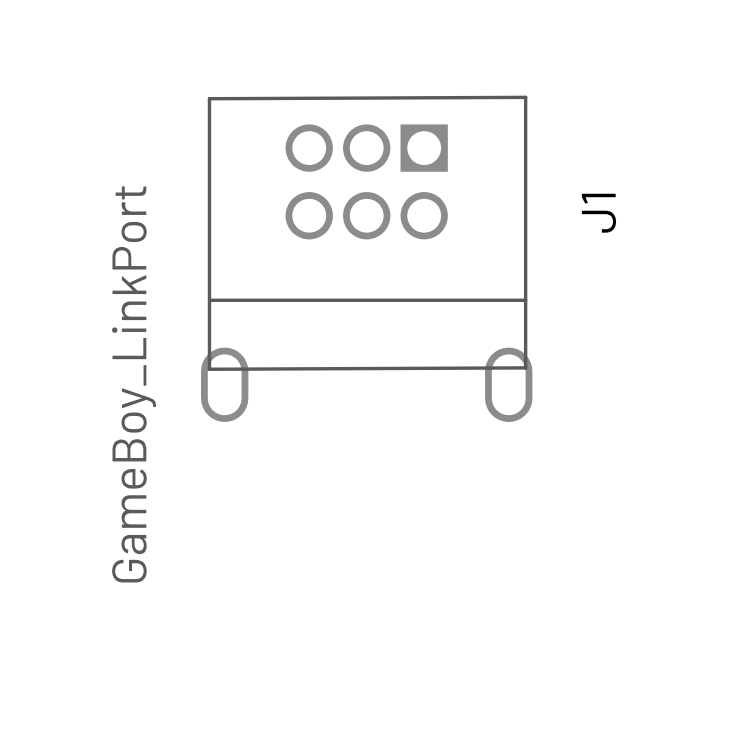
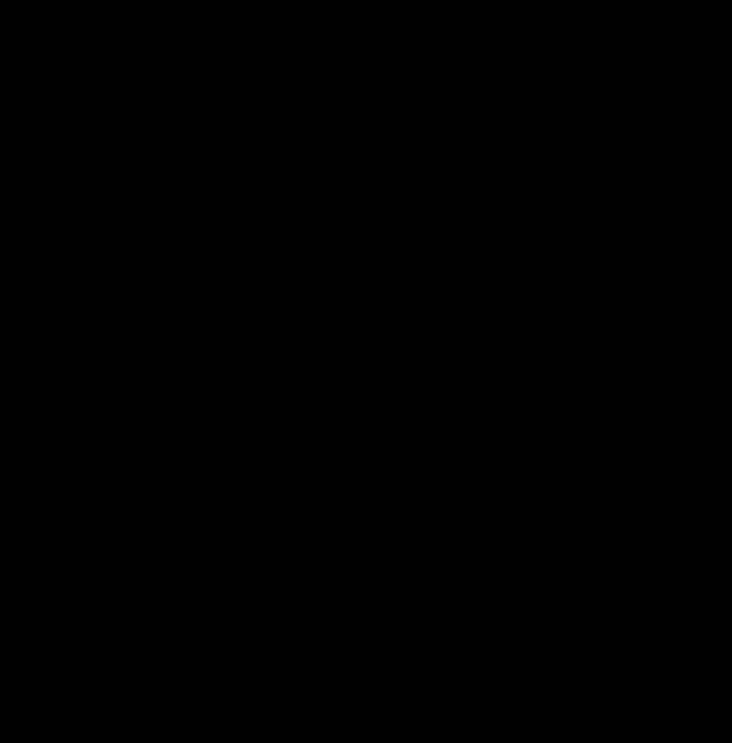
J1: GameBoy_LinkPort (366, 258) -> none

